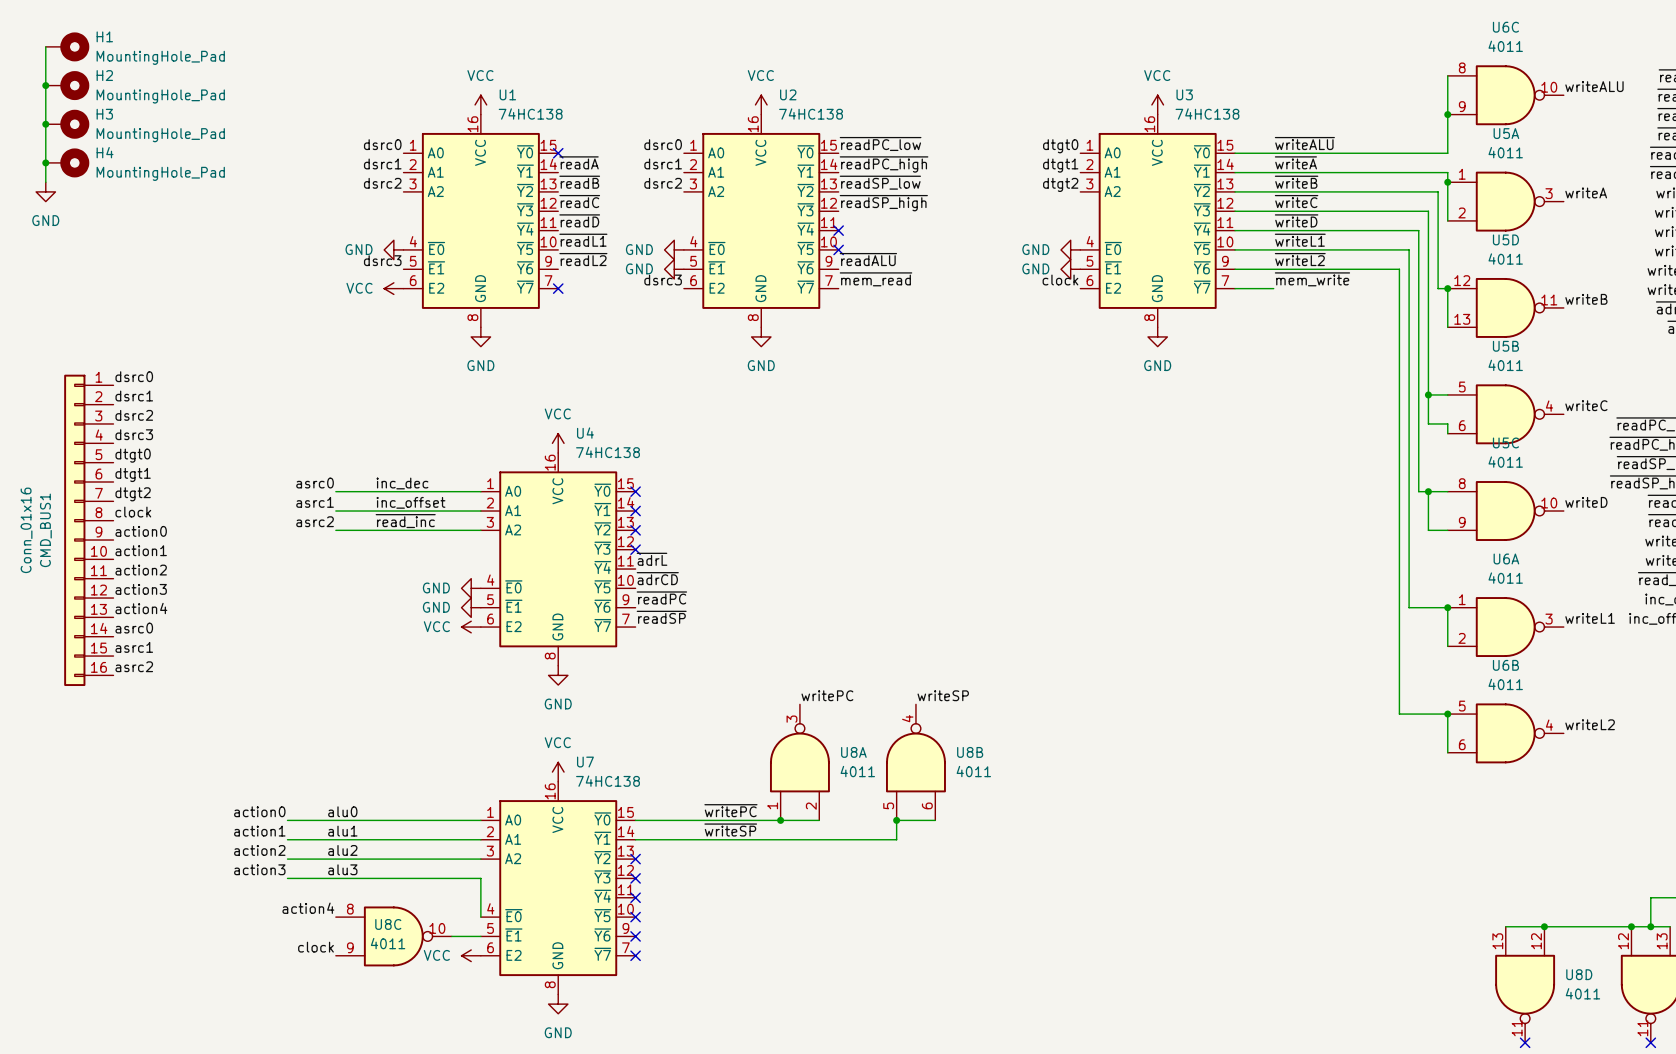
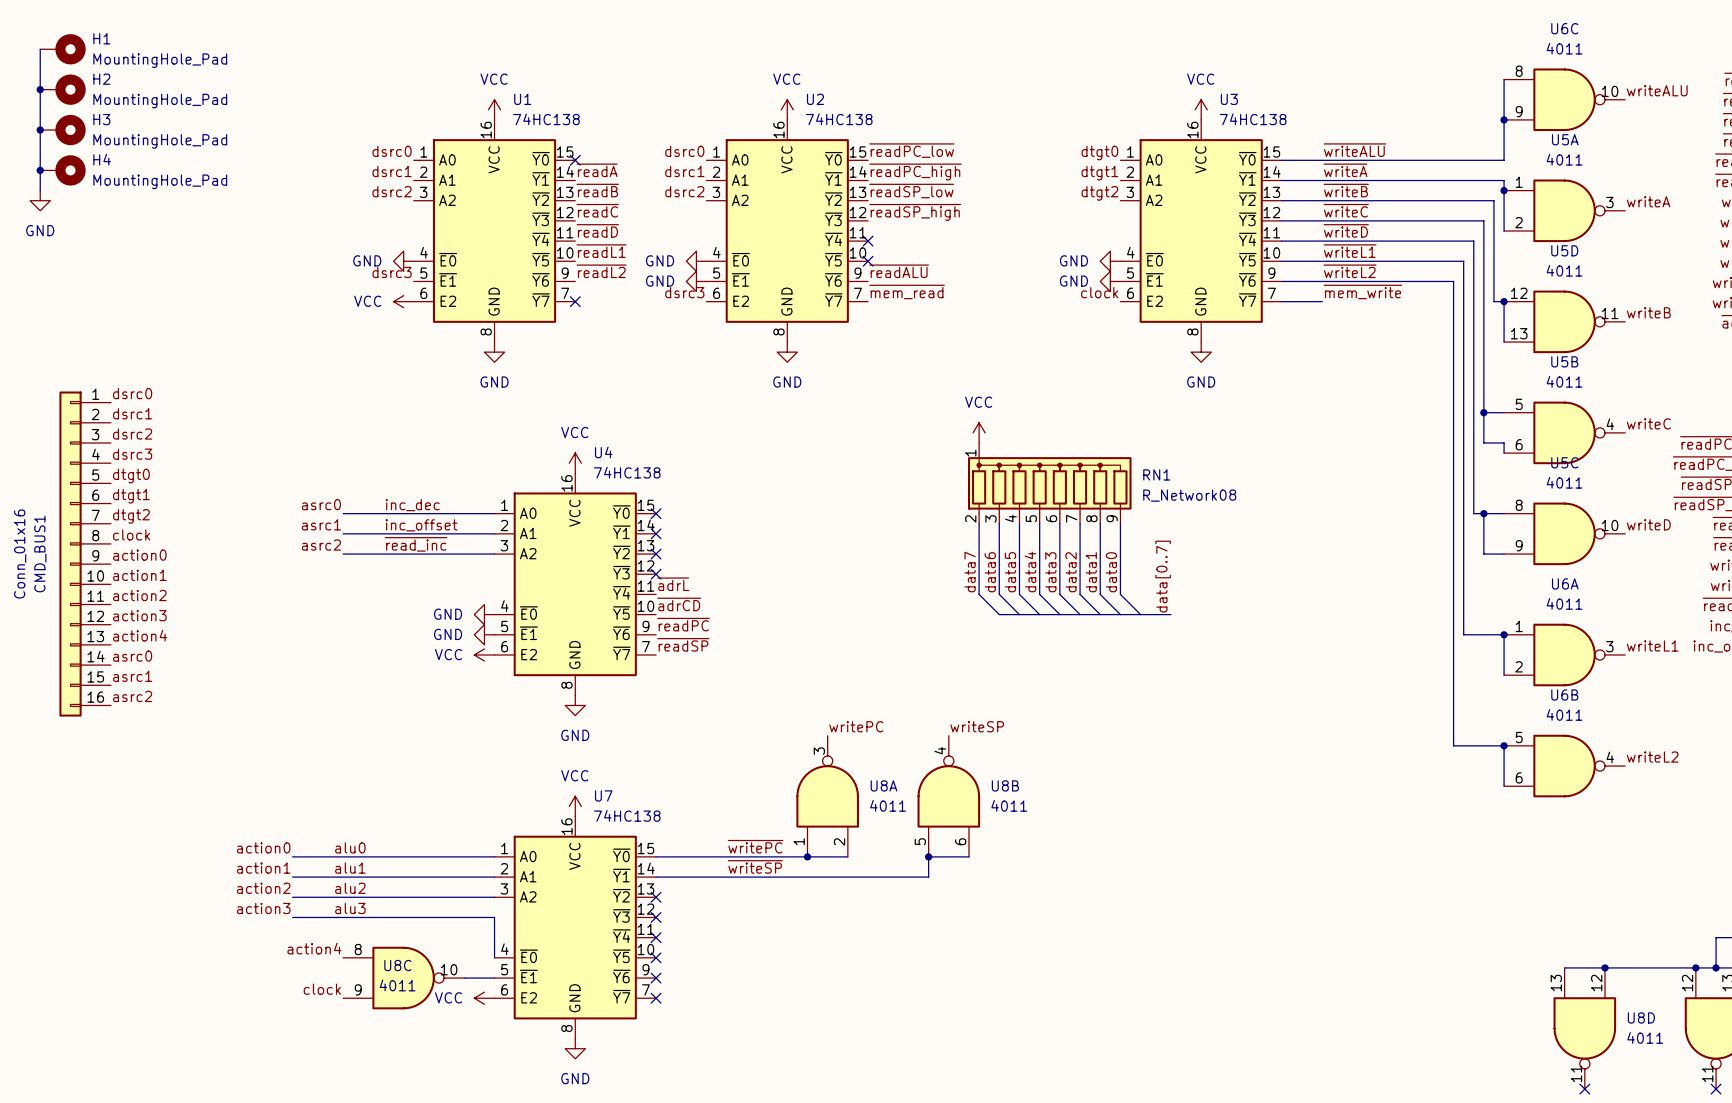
power symbol: none -> VCC (979, 432)
RN1: none -> R_Network08 (1049, 483)
wire: none -> (979, 523) (979, 594) (999, 614)
wire: none -> (999, 523) (999, 594) (1019, 614)
wire: none -> (1019, 523) (1019, 594) (1039, 614)
wire: none -> (1039, 523) (1039, 594) (1059, 614)
wire: none -> (1059, 523) (1059, 594) (1080, 614)
wire: none -> (1080, 523) (1080, 594) (1100, 614)
wire: none -> (1100, 523) (1100, 594) (1120, 614)
wire: none -> (1120, 523) (1120, 594) (1140, 614)
label: none -> data7 (970, 571)
label: none -> data6 (990, 572)
label: none -> data5 (1010, 572)
label: none -> data4 (1030, 571)
label: none -> data3 (1050, 572)
label: none -> data2 (1071, 572)
label: none -> data1 (1091, 572)
label: none -> data0 (1111, 572)
label: none -> data[0..7] (1163, 576)
bus: none -> (999, 614) (1170, 614)

